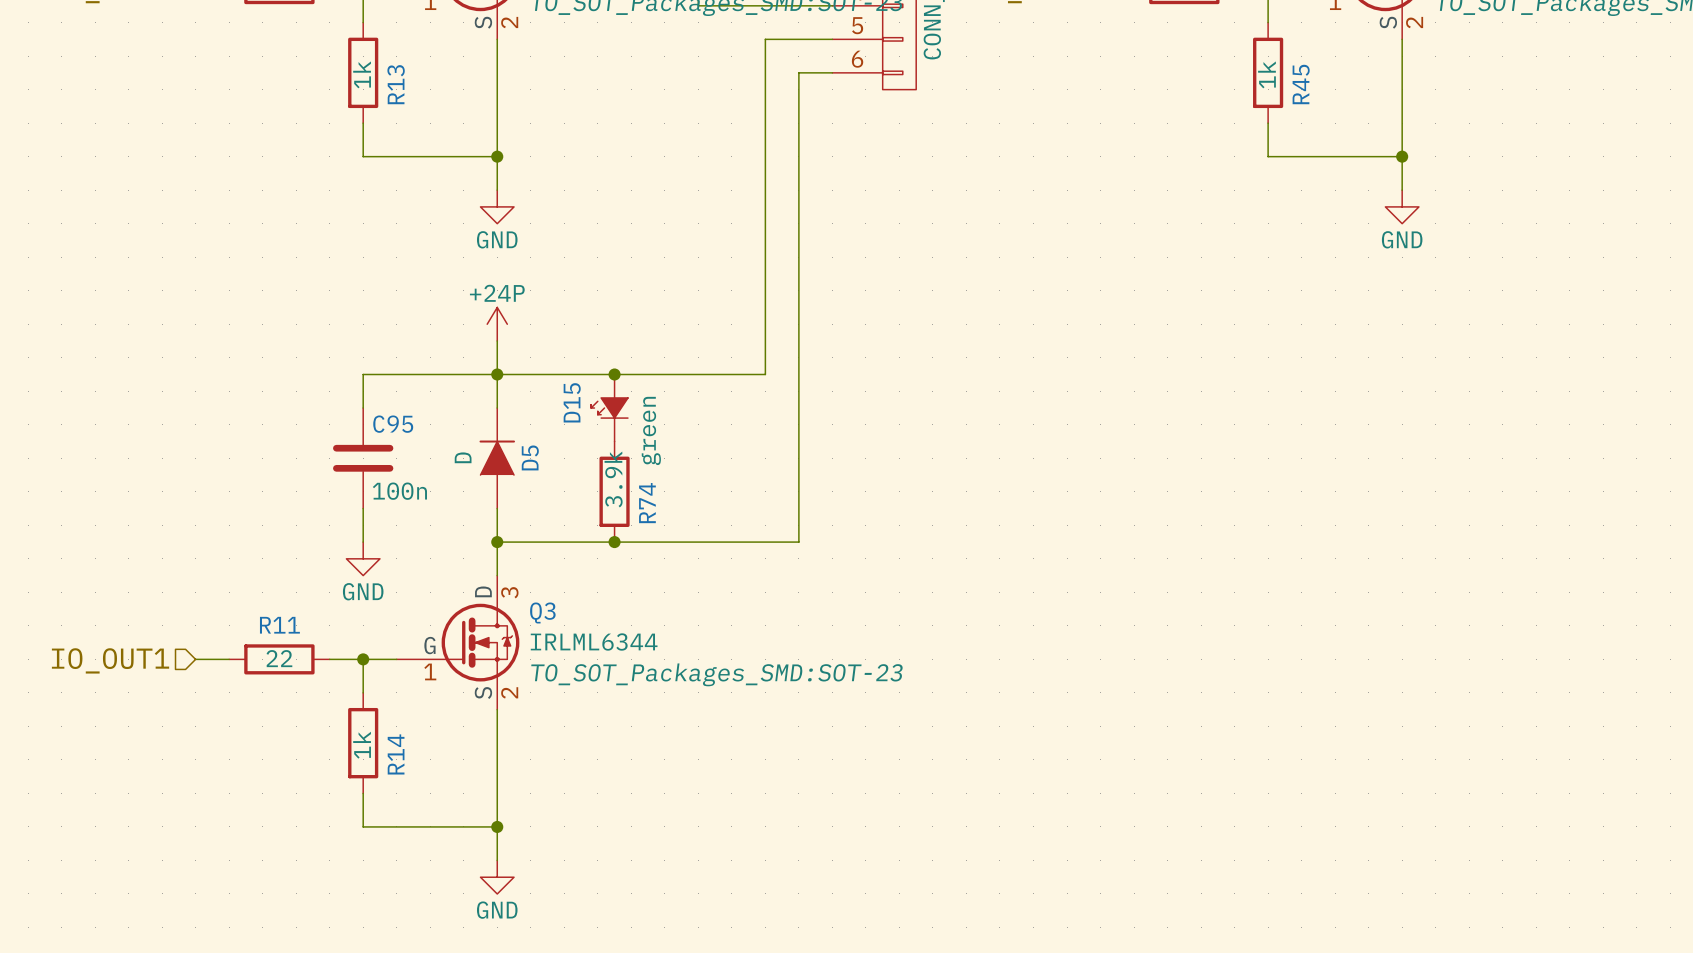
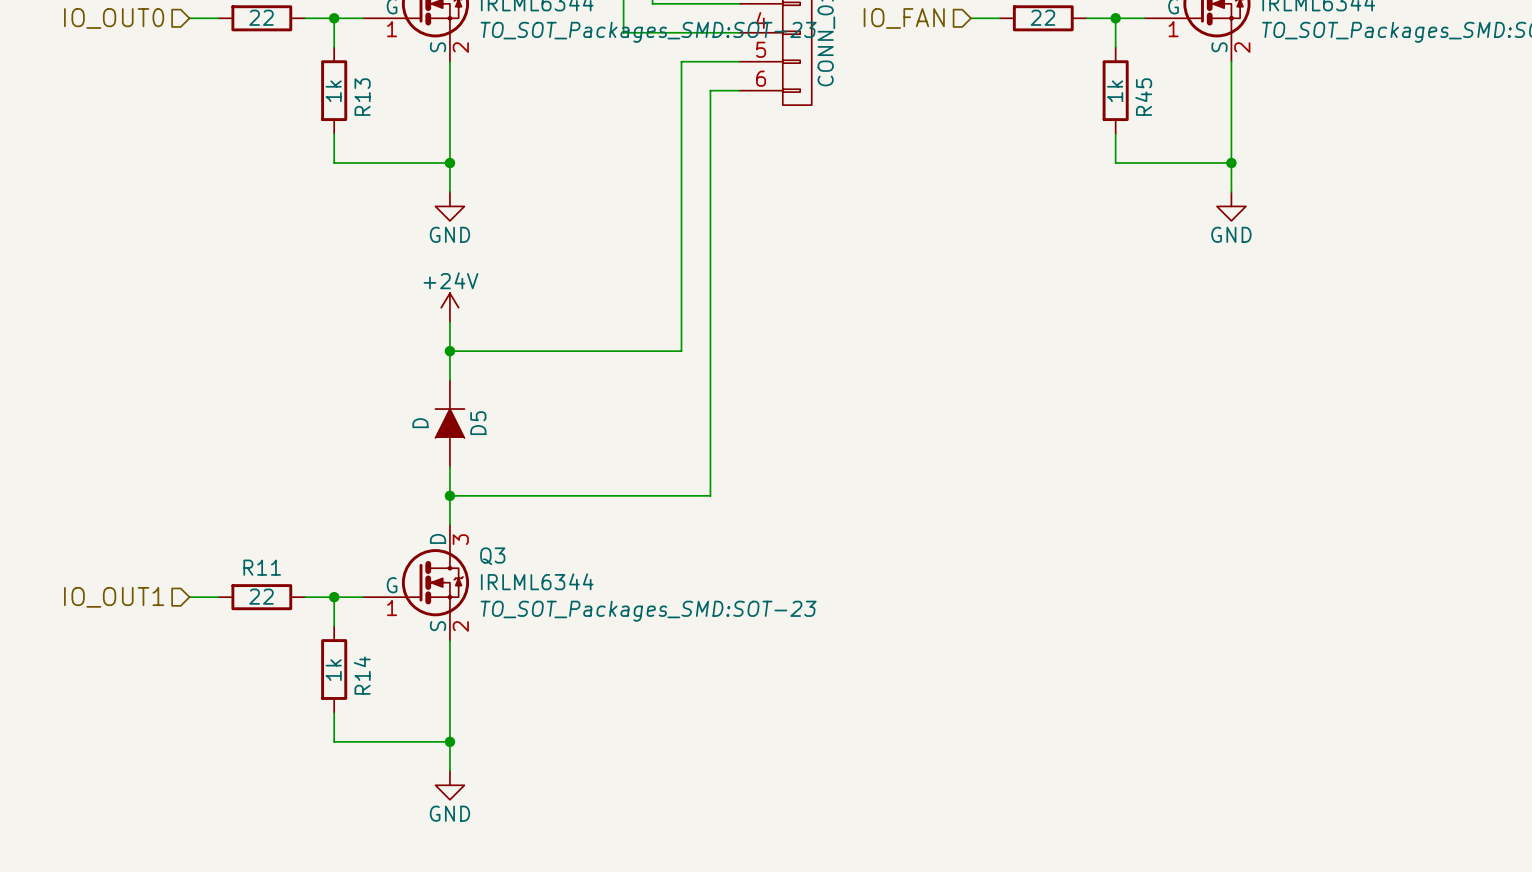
power symbol: +24P (497, 324) -> +24V (449, 307)
wire: (497, 374) (363, 374) (363, 408) -> none
junction: (614, 374) -> none
D15: green (609, 408) -> none
C95: 100n (363, 458) -> none
R74: 3.9k (614, 491) -> none
wire: (363, 508) (363, 542) -> none
junction: (614, 542) -> none
power symbol: GND (363, 558) -> none

